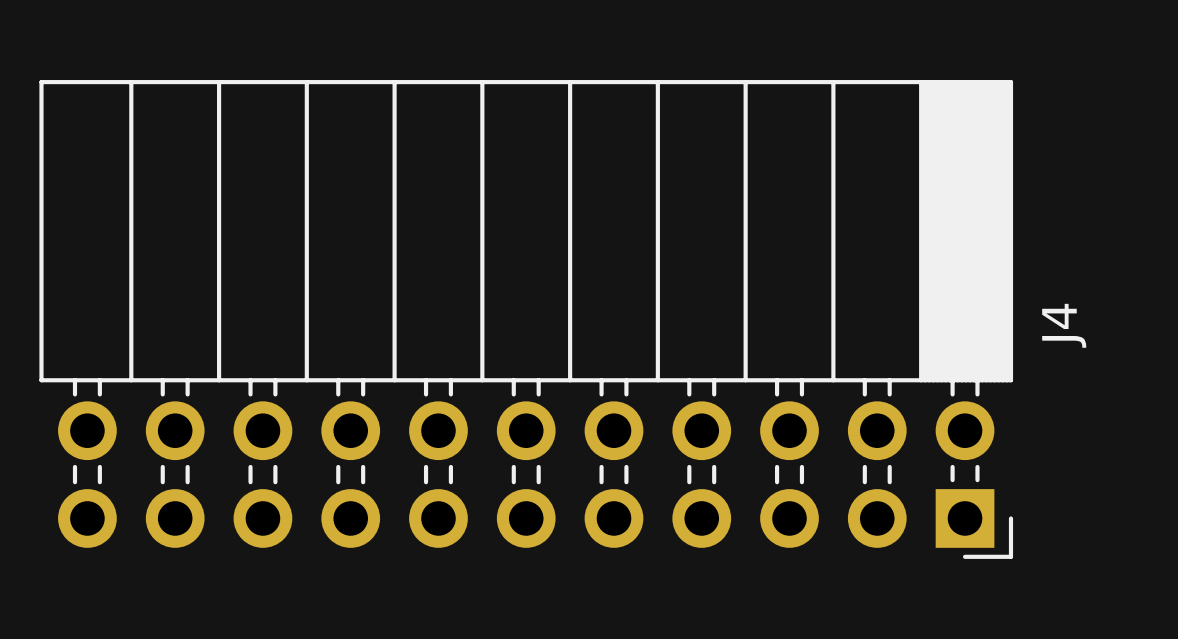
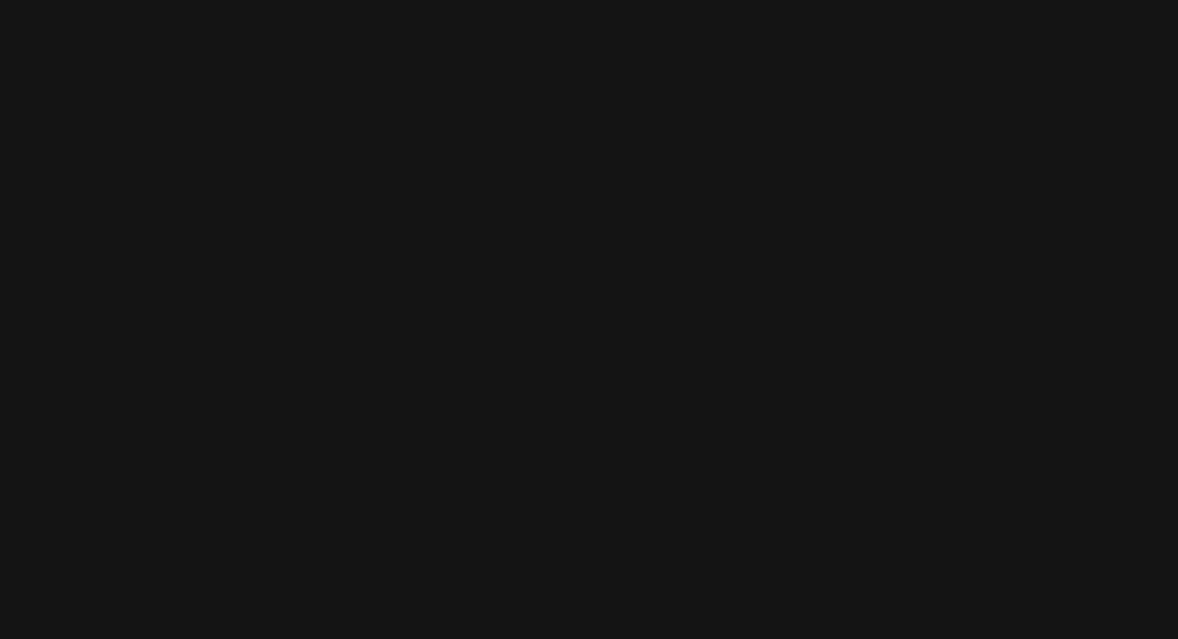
J4: (526, 319) -> none

